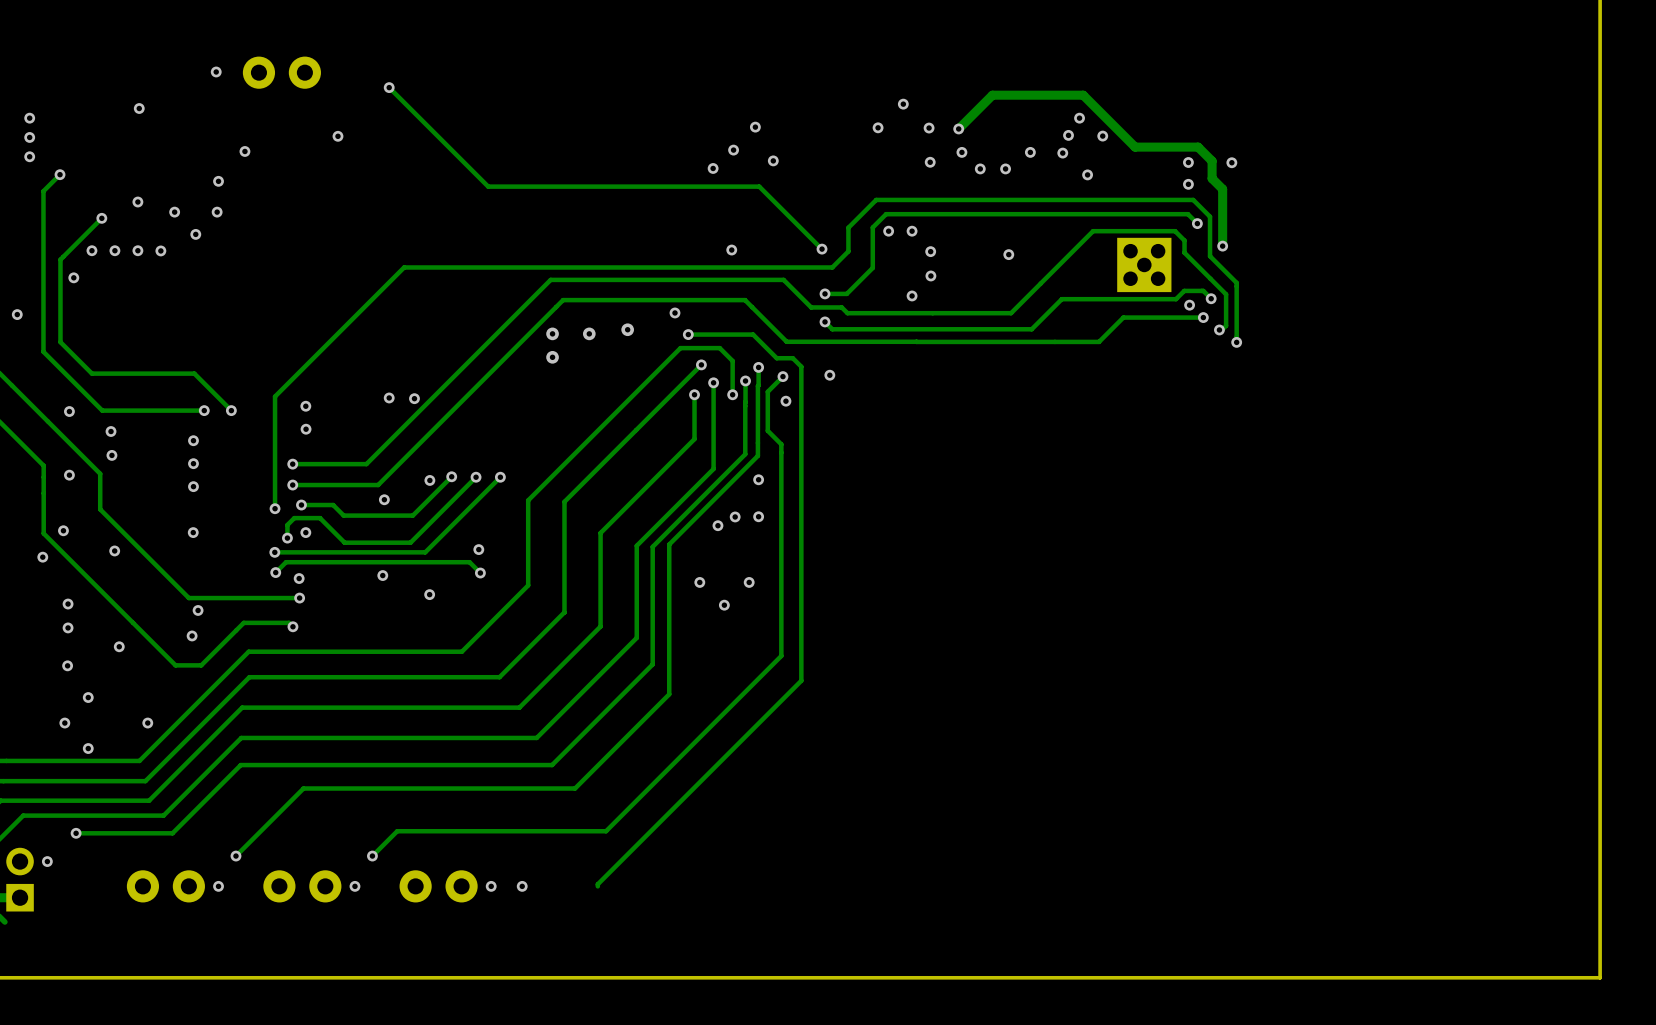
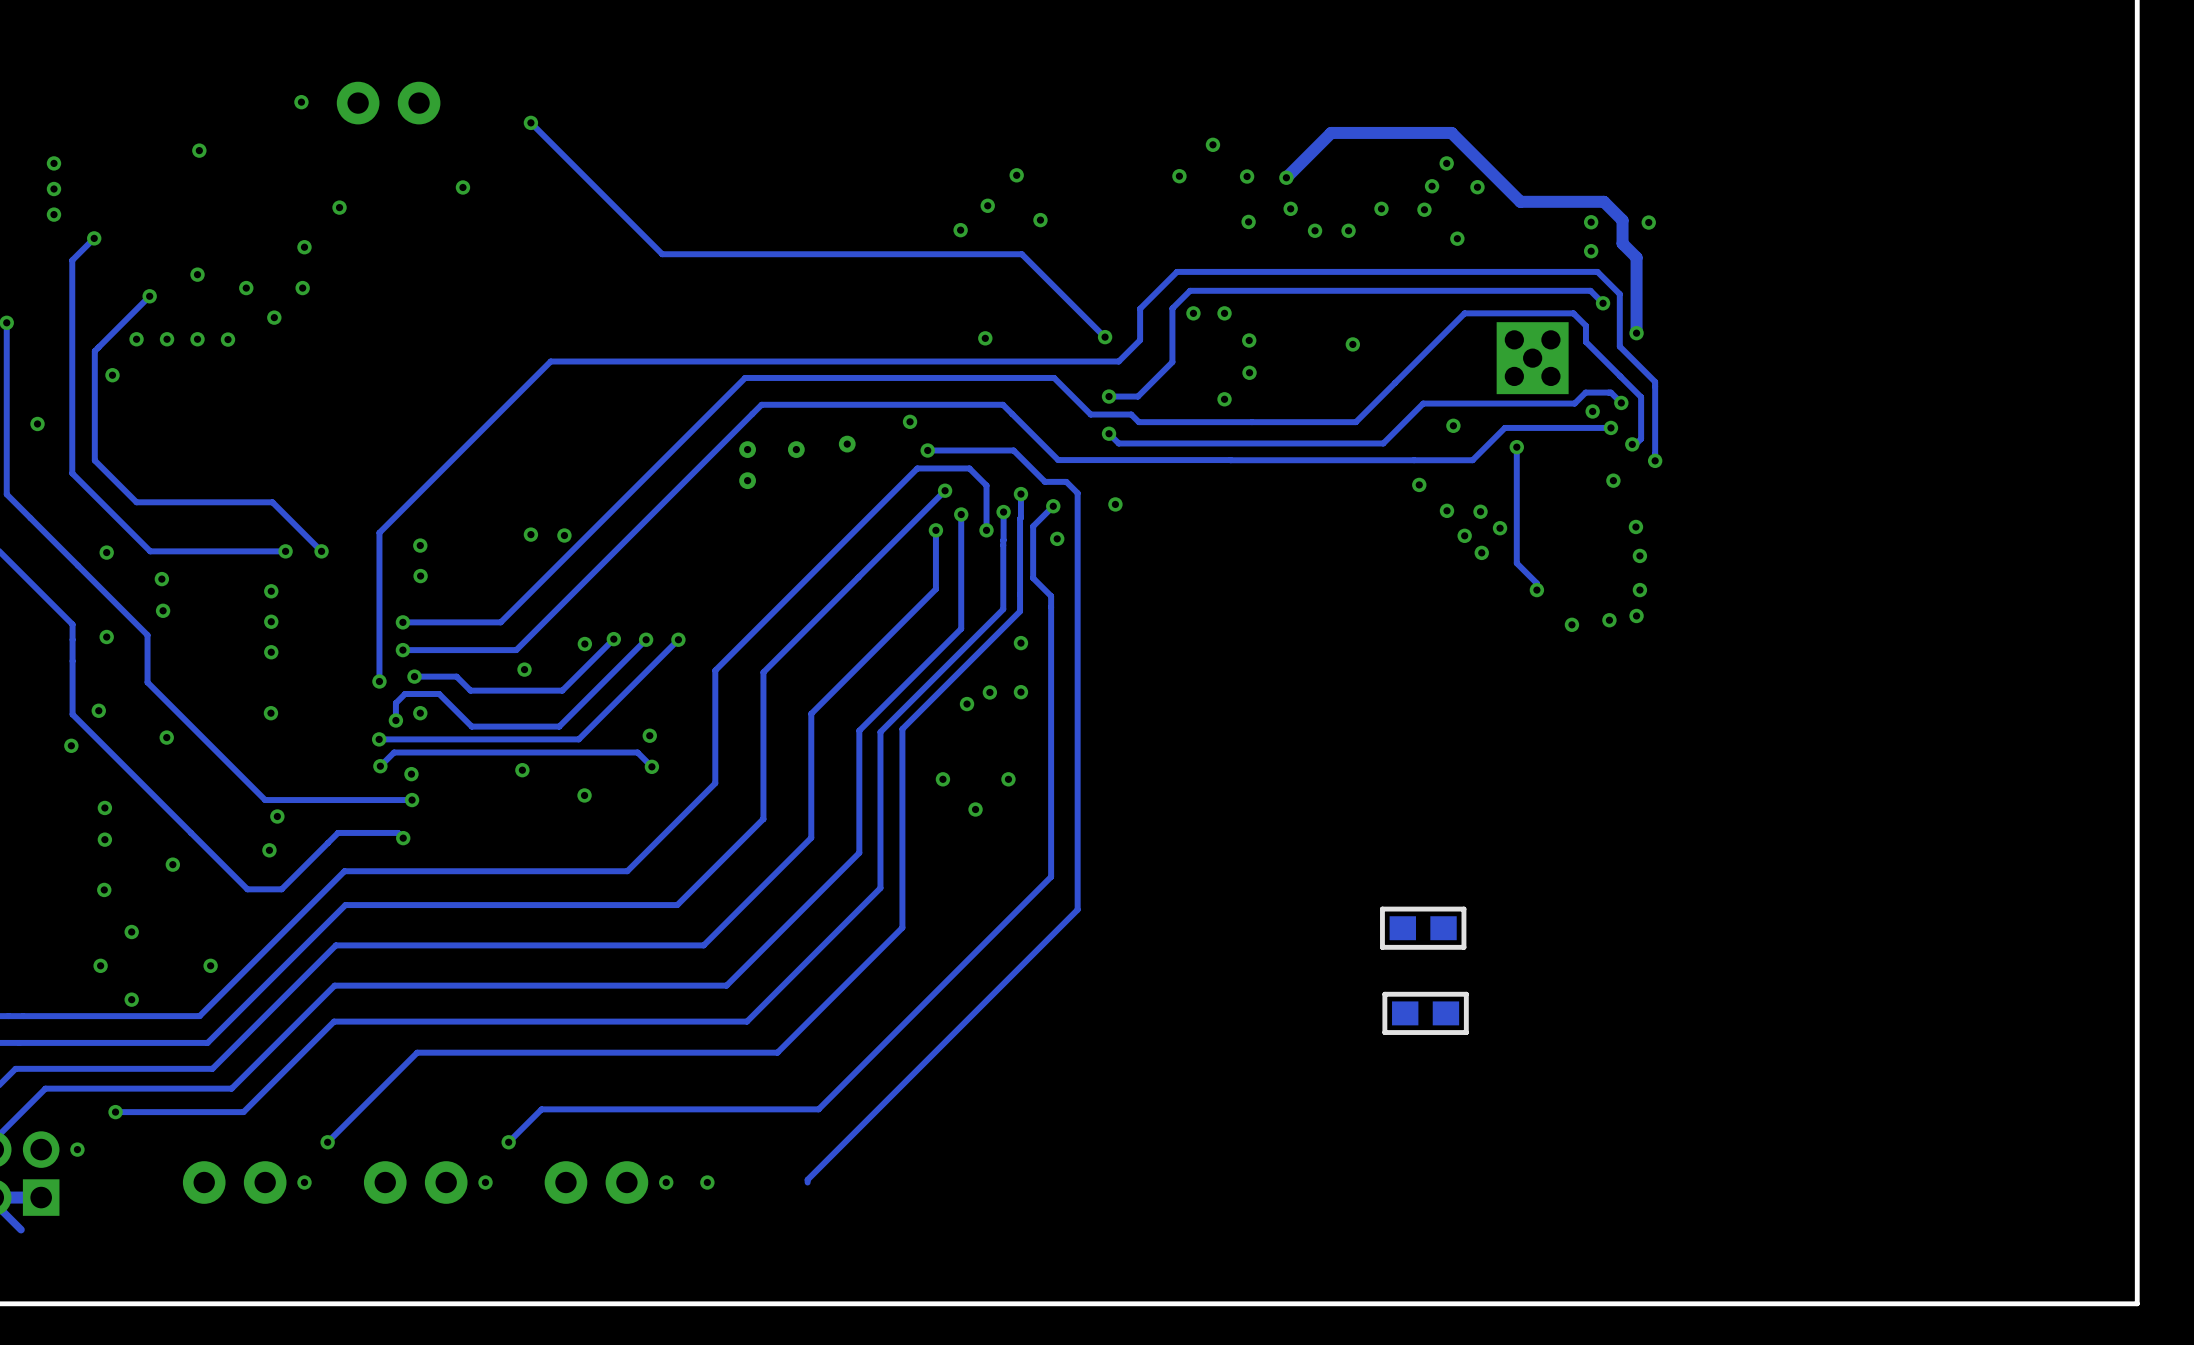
via: none -> (1453, 425)
track: none -> (1516, 447) (1516, 563) (1536, 583) (1536, 590)
via: none -> (1516, 447)
via: none -> (1613, 480)
via: none -> (1419, 484)
via: none -> (1447, 510)
via: none -> (1480, 511)
via: none -> (1635, 526)
via: none -> (1500, 528)
via: none -> (1464, 535)
via: none -> (1481, 552)
via: none -> (1639, 555)
via: none -> (1536, 590)
via: none -> (1639, 590)
via: none -> (1636, 615)
via: none -> (1609, 620)
via: none -> (1571, 624)
part: none -> (1423, 928)
part: none -> (1425, 1013)

